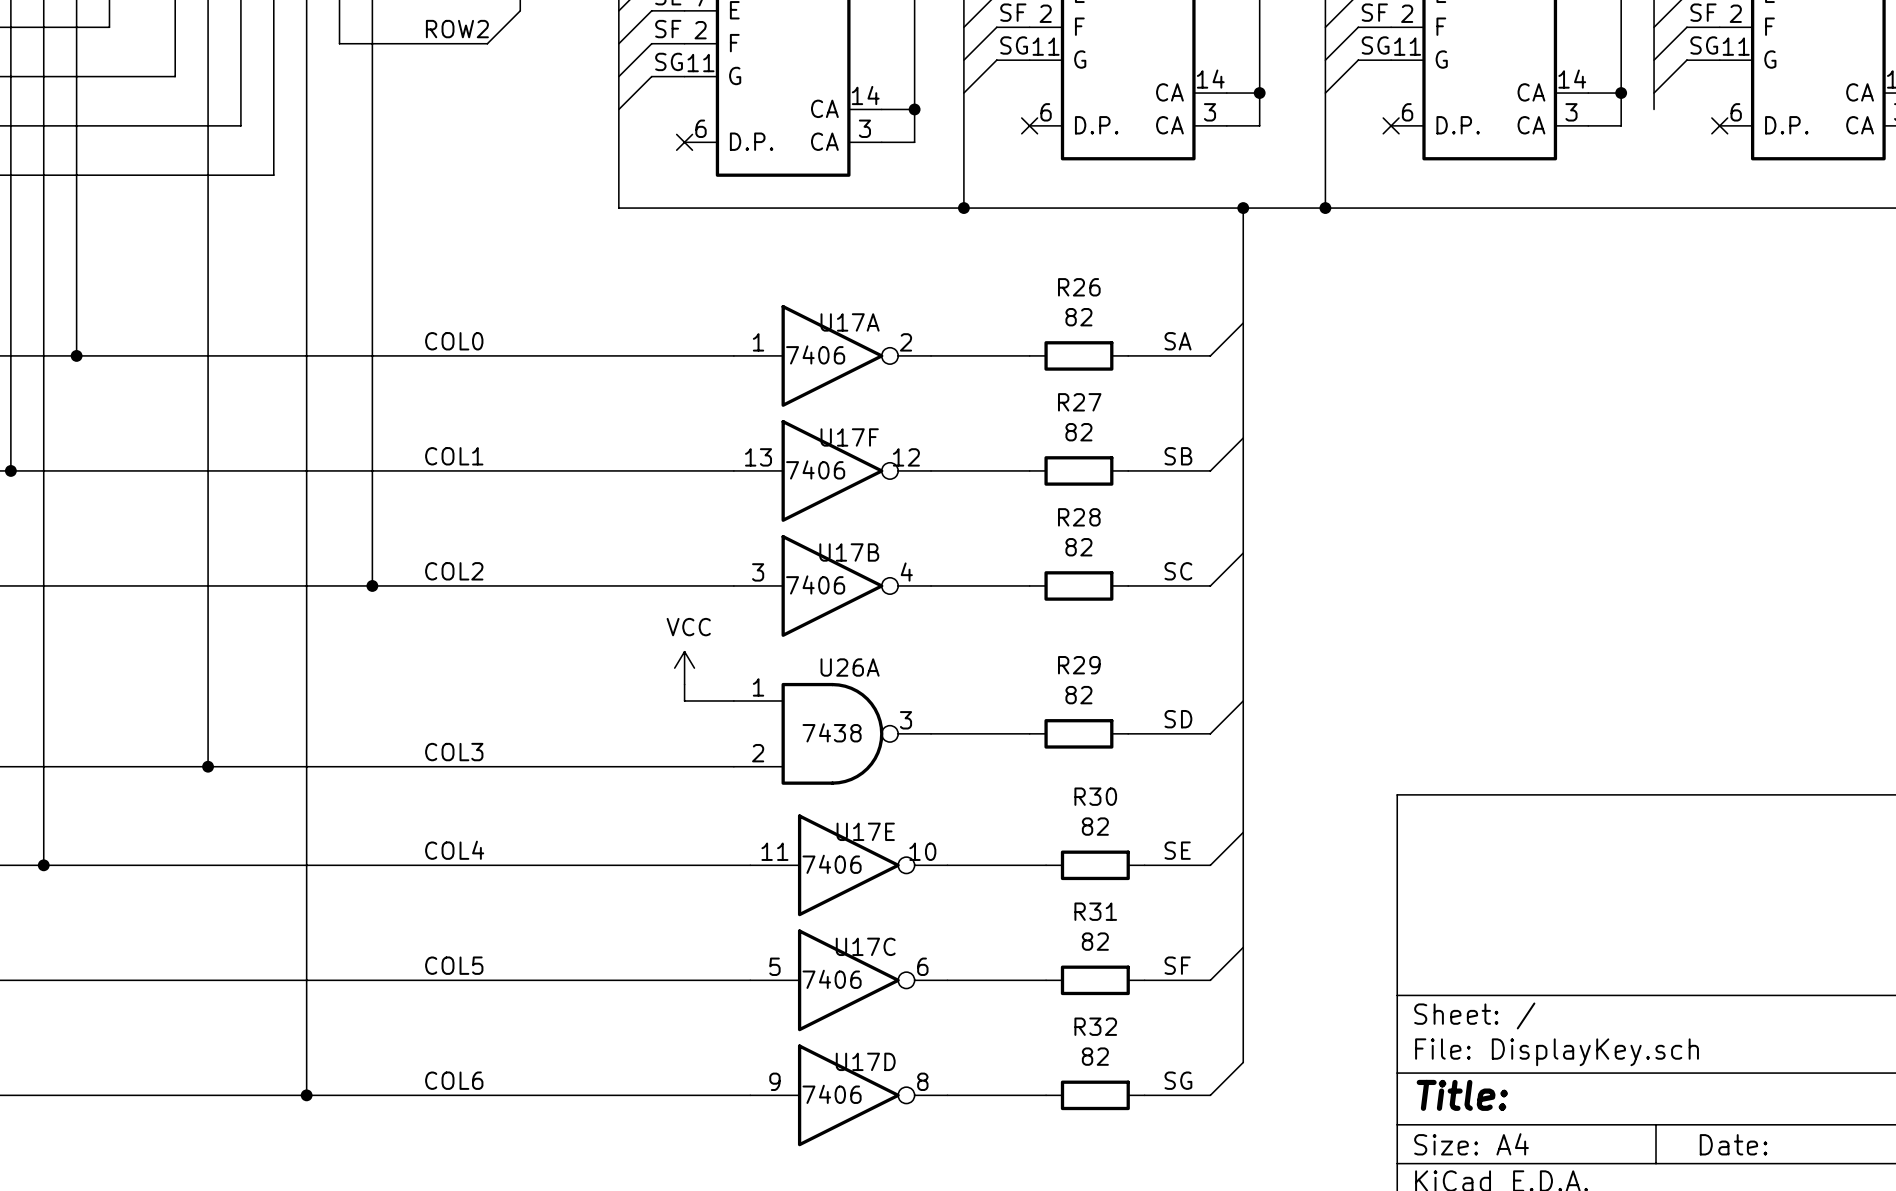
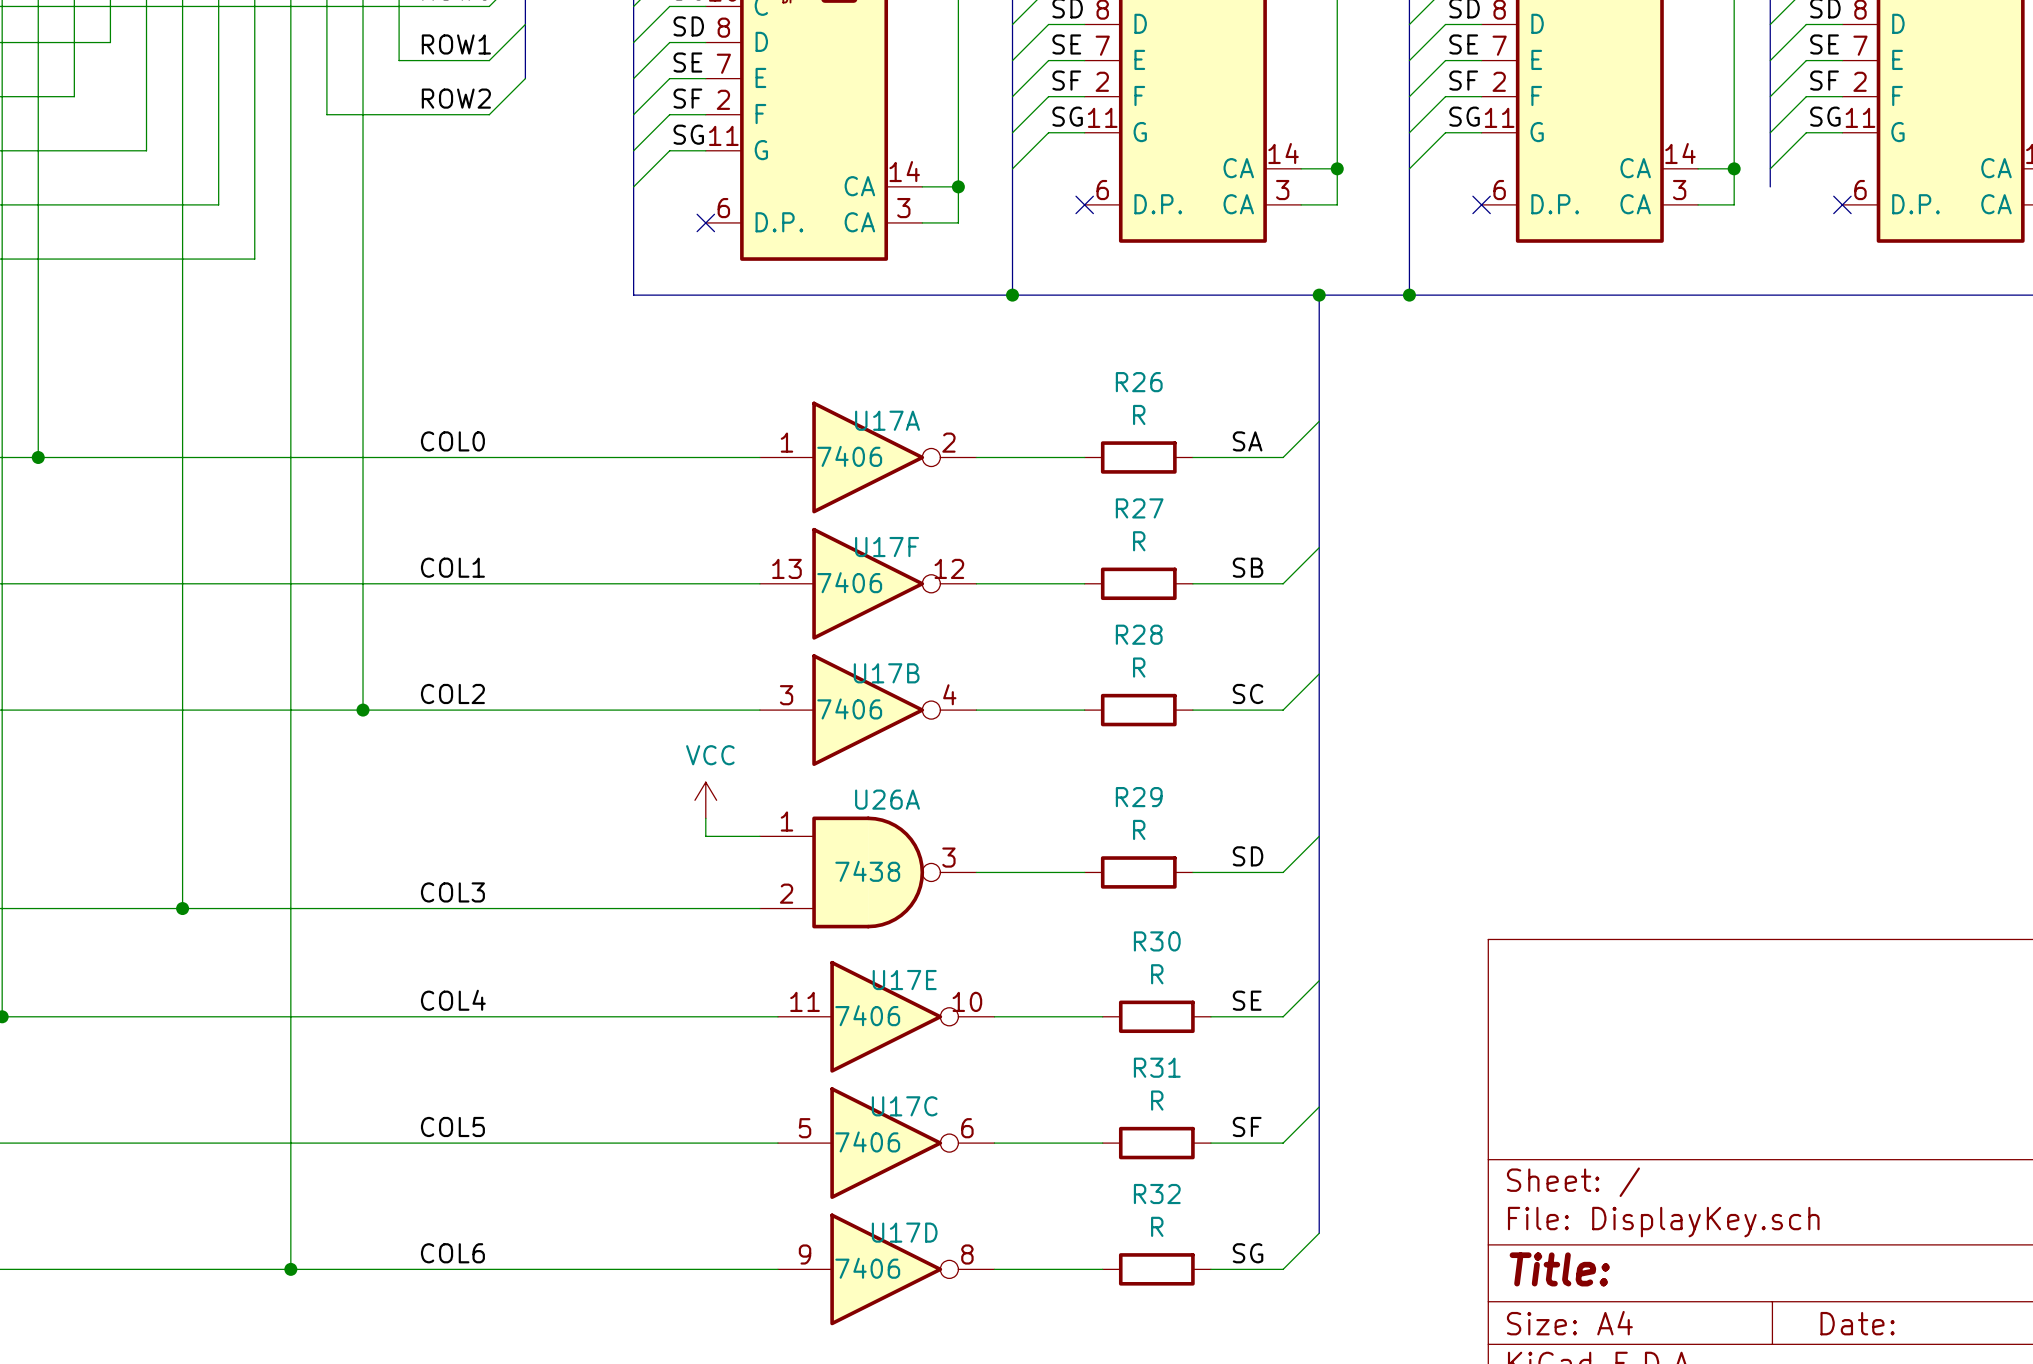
R26 value: 82 (1078, 317) -> R (1139, 414)
R27 value: 82 (1078, 432) -> R (1139, 541)
R28 value: 82 (1078, 547) -> R (1139, 667)
R29 value: 82 (1078, 695) -> R (1139, 829)
R30 value: 82 (1095, 826) -> R (1157, 974)
R31 value: 82 (1095, 941) -> R (1157, 1100)
R32 value: 82 (1095, 1056) -> R (1157, 1226)

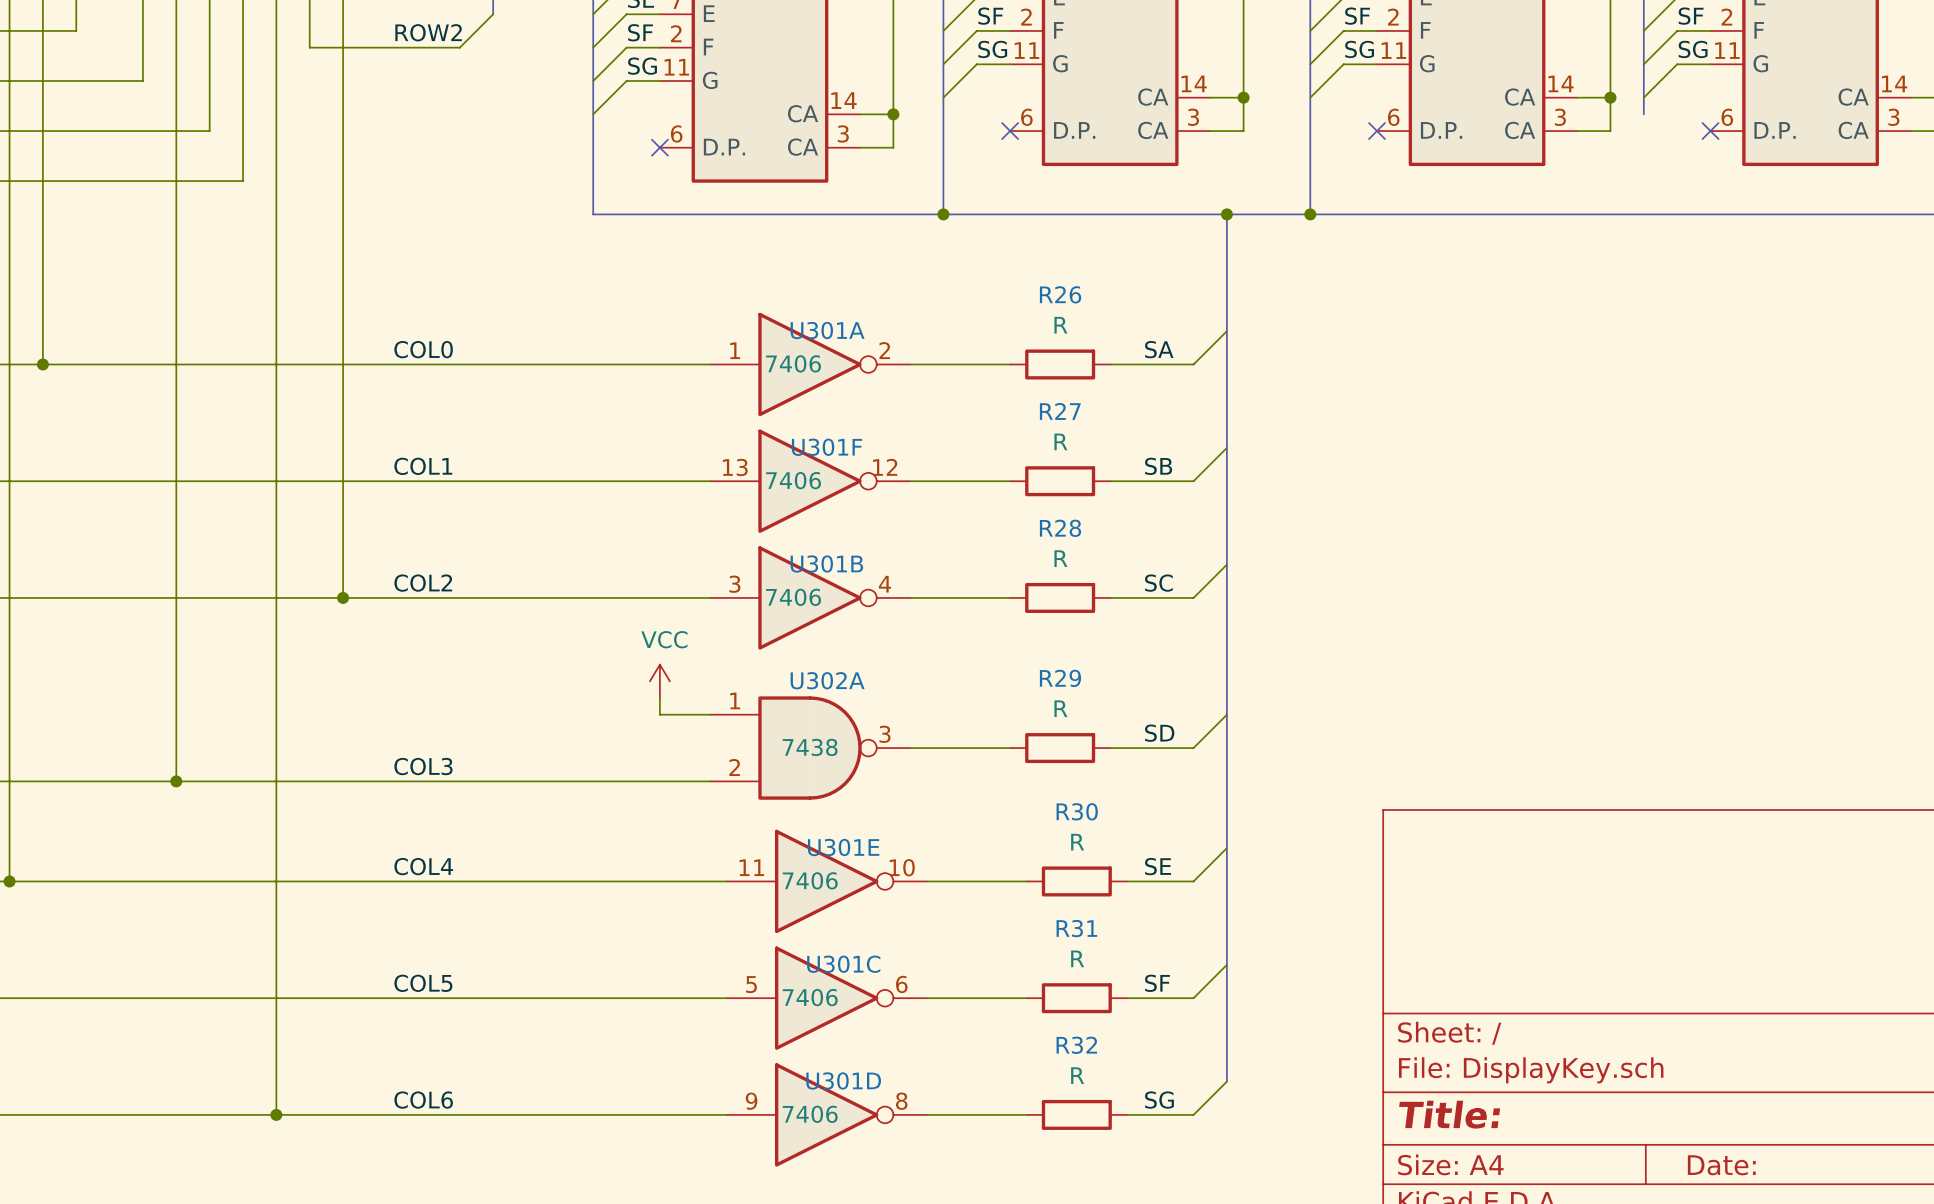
U17A name: U17A (887, 420) -> U301A (827, 330)
U17F name: U17F (887, 547) -> U301F (827, 447)
U17B name: U17B (886, 673) -> U301B (826, 564)
U26A name: U26A (887, 799) -> U302A (827, 680)
U17E name: U17E (904, 980) -> U301E (843, 847)
U17C name: U17C (904, 1106) -> U301C (843, 964)
U17D name: U17D (904, 1232) -> U301D (843, 1080)

